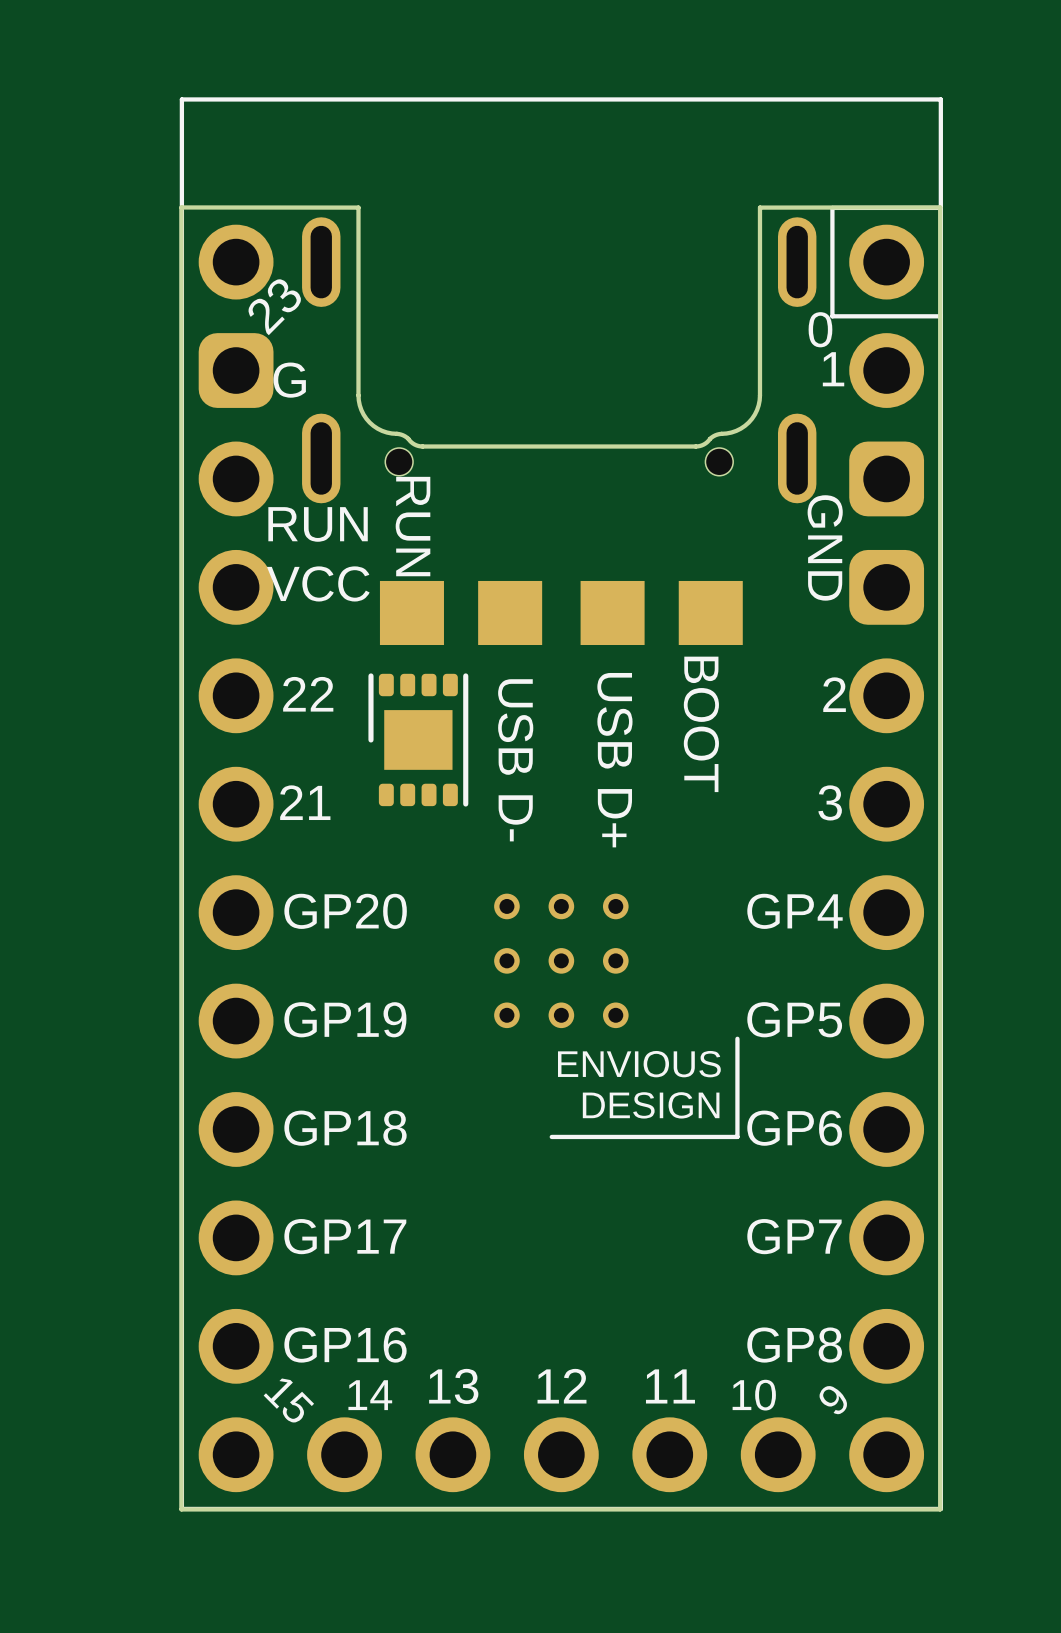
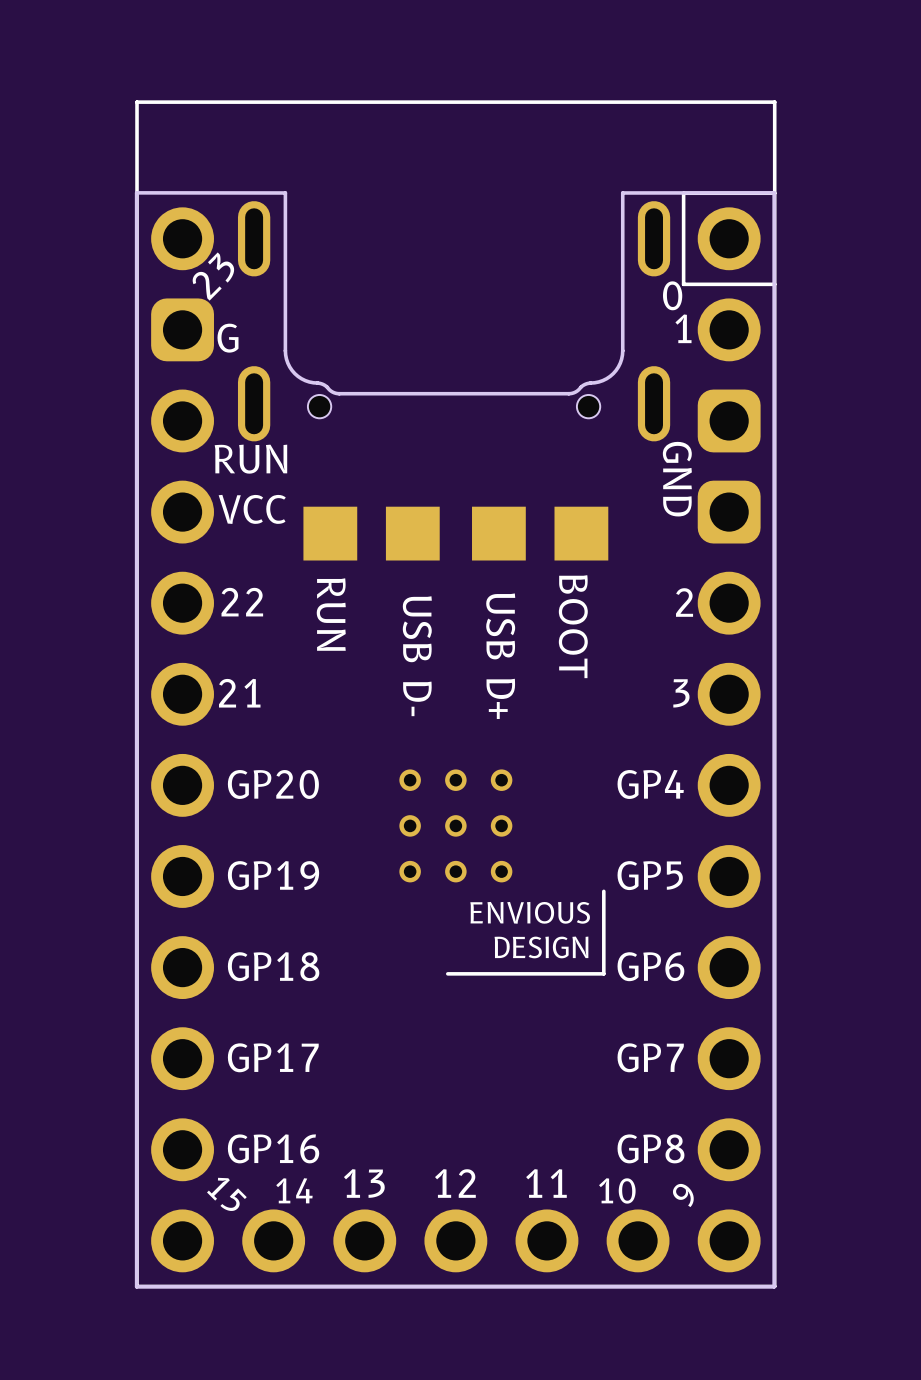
text position: RUN (413, 526) -> RUN (331, 614)
part: (418, 739) -> none

